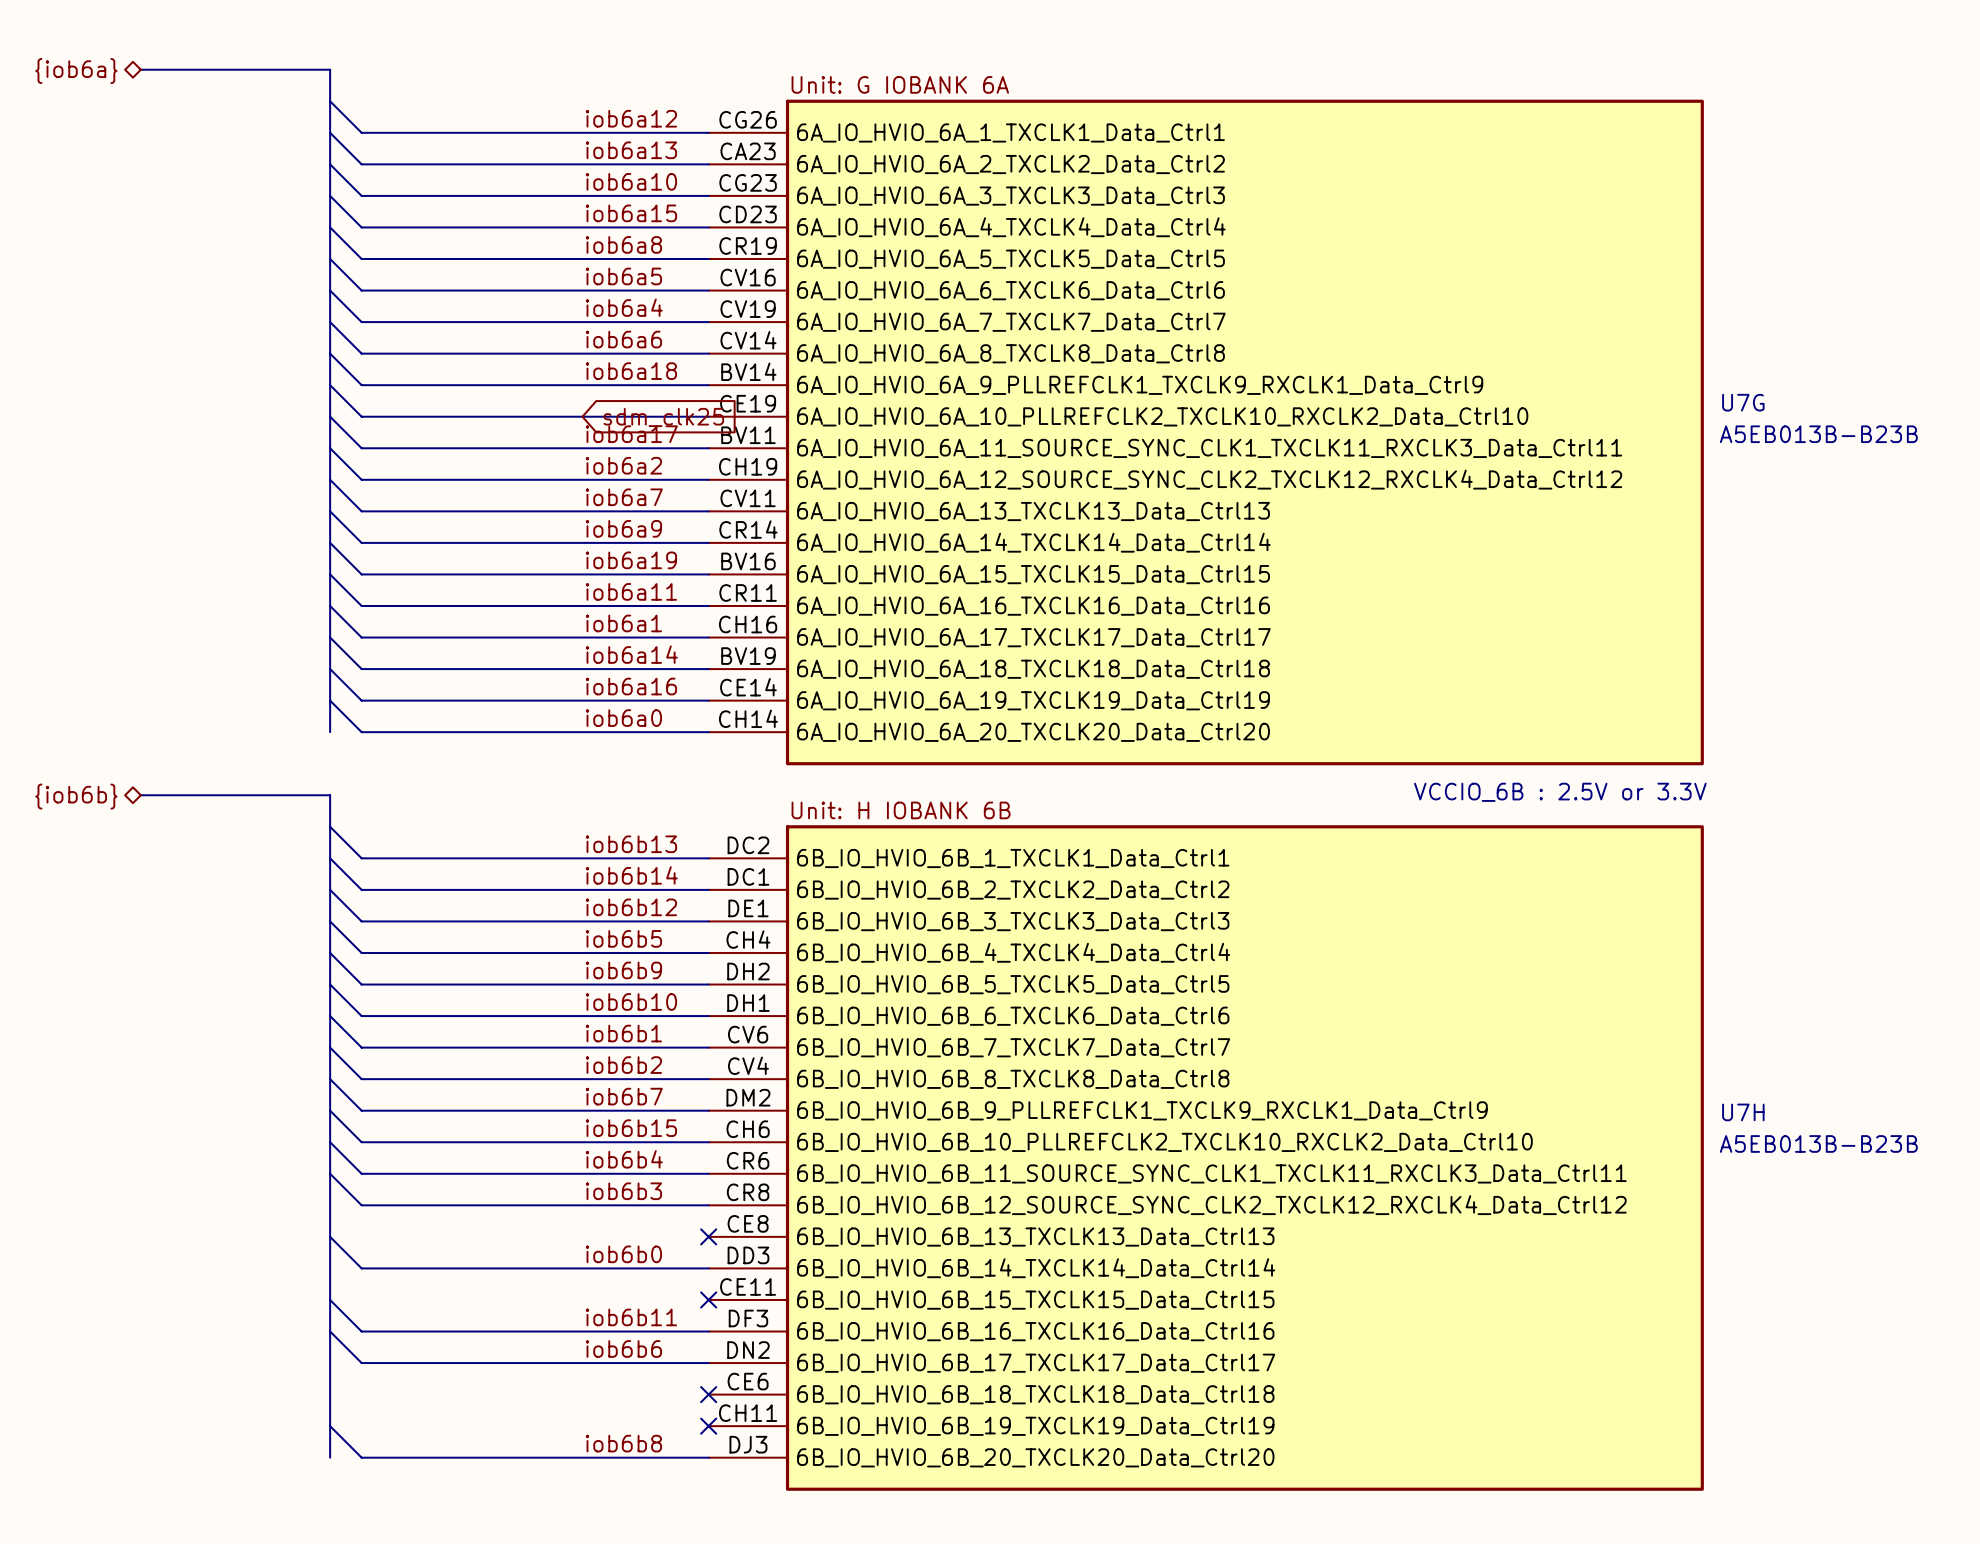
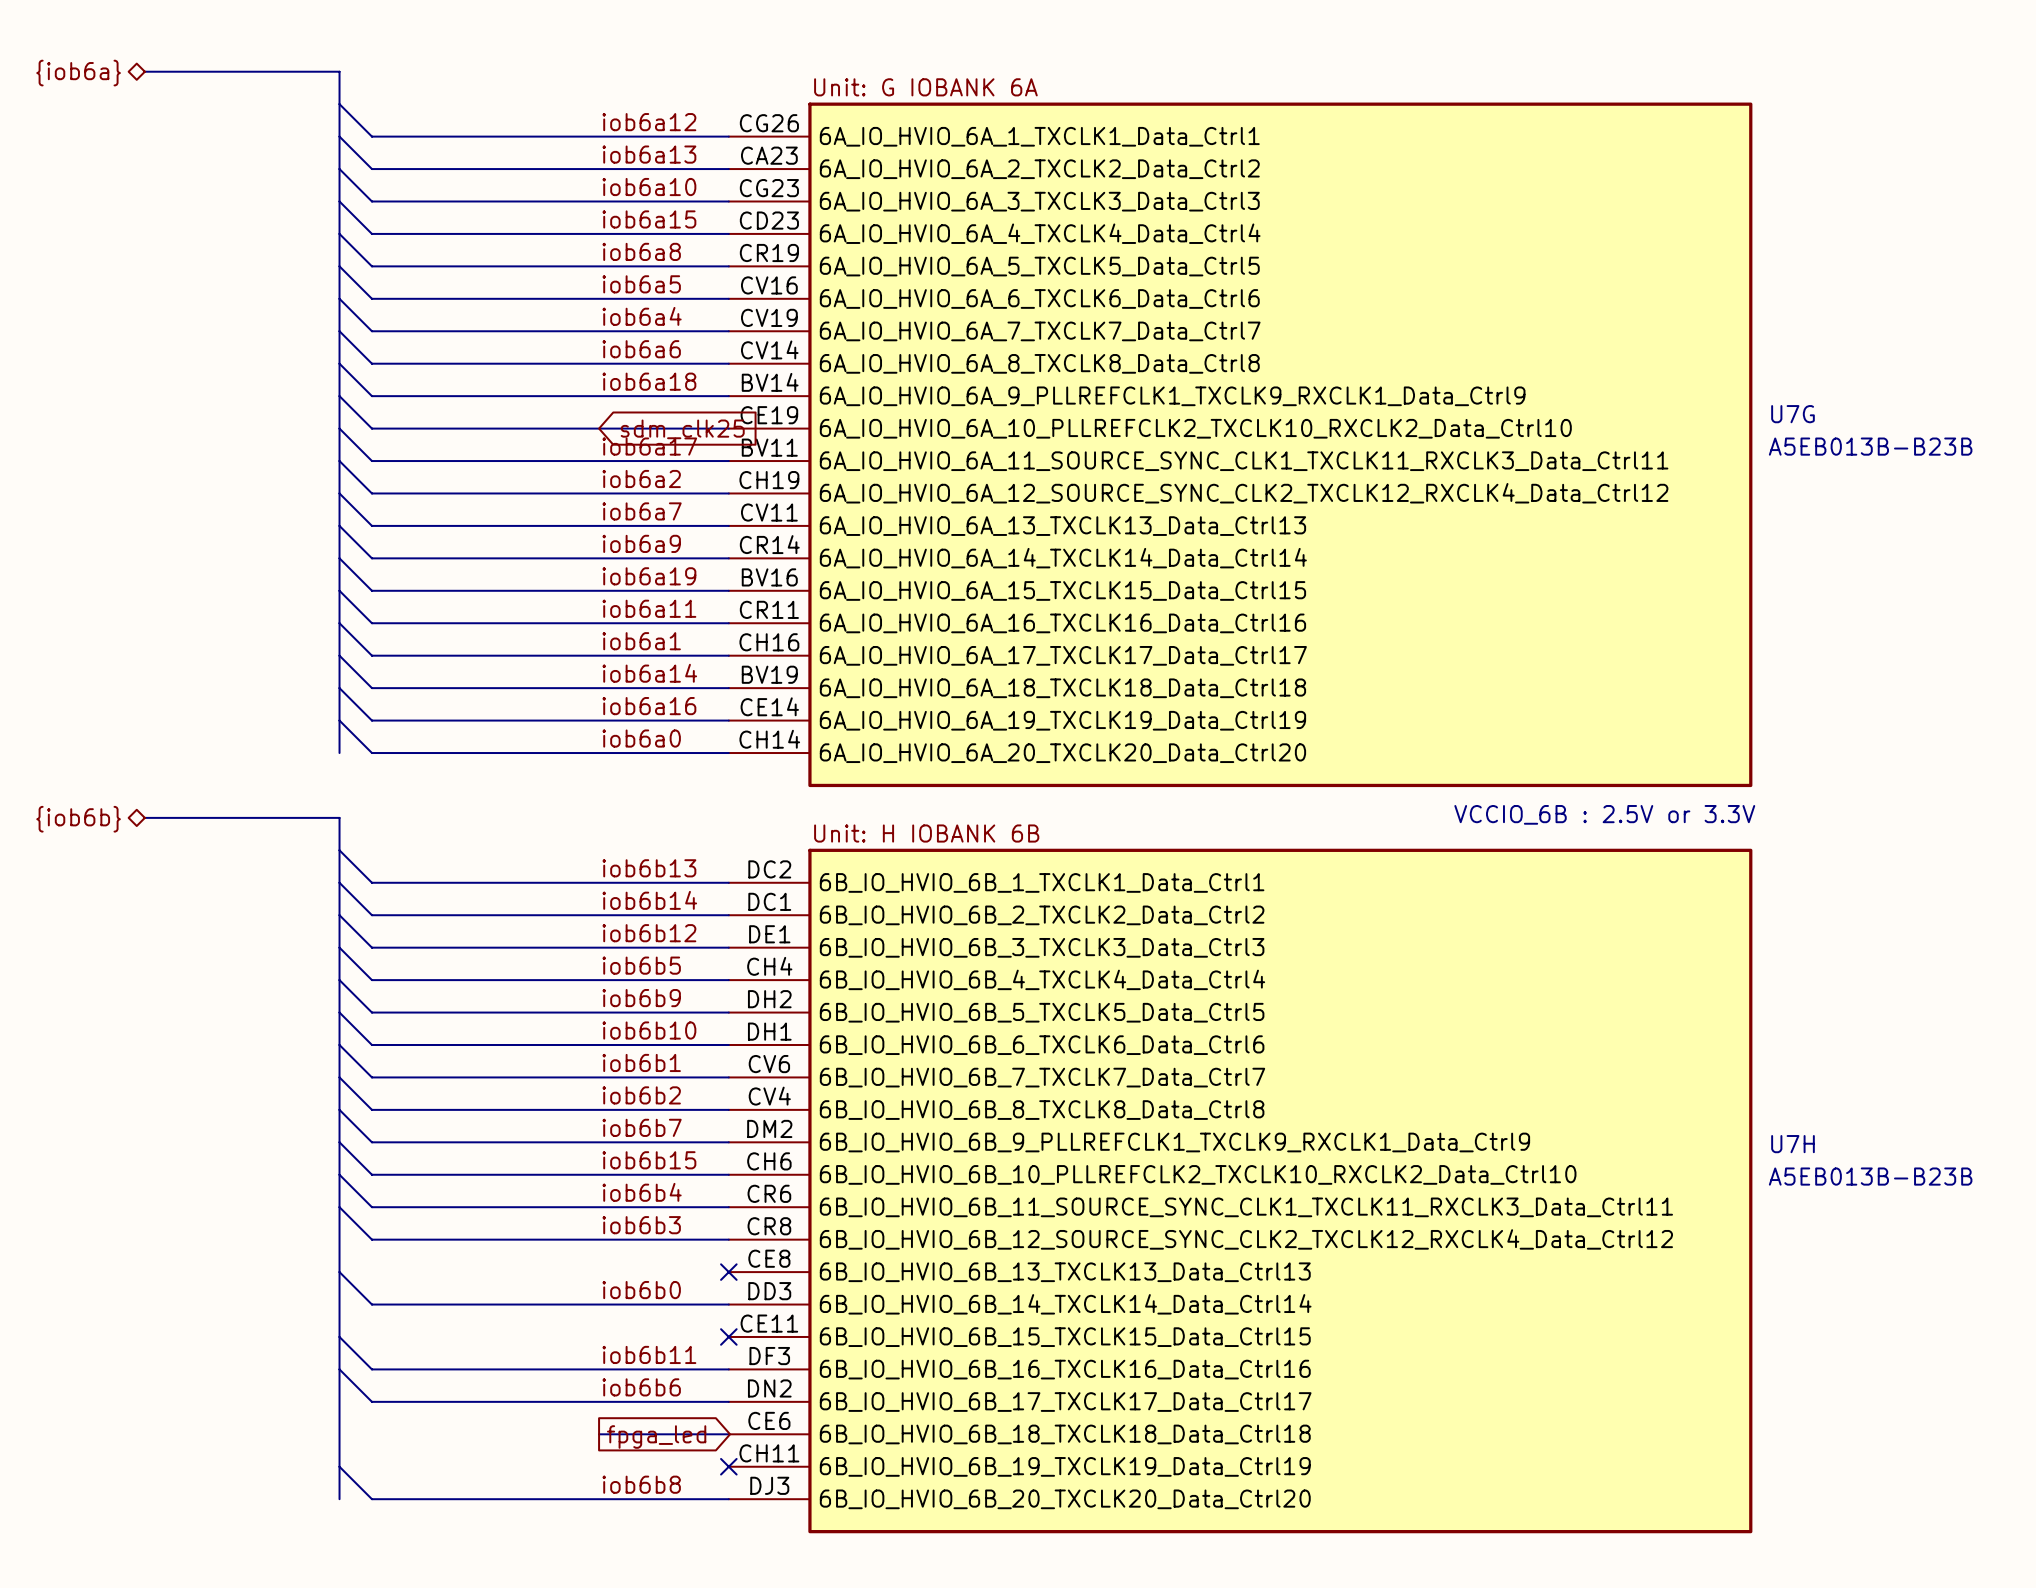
wire: none -> (599, 1434) (728, 1434)
no-connect mark: (708, 1394) -> none
global label: none -> fpga_led (656, 1437)

